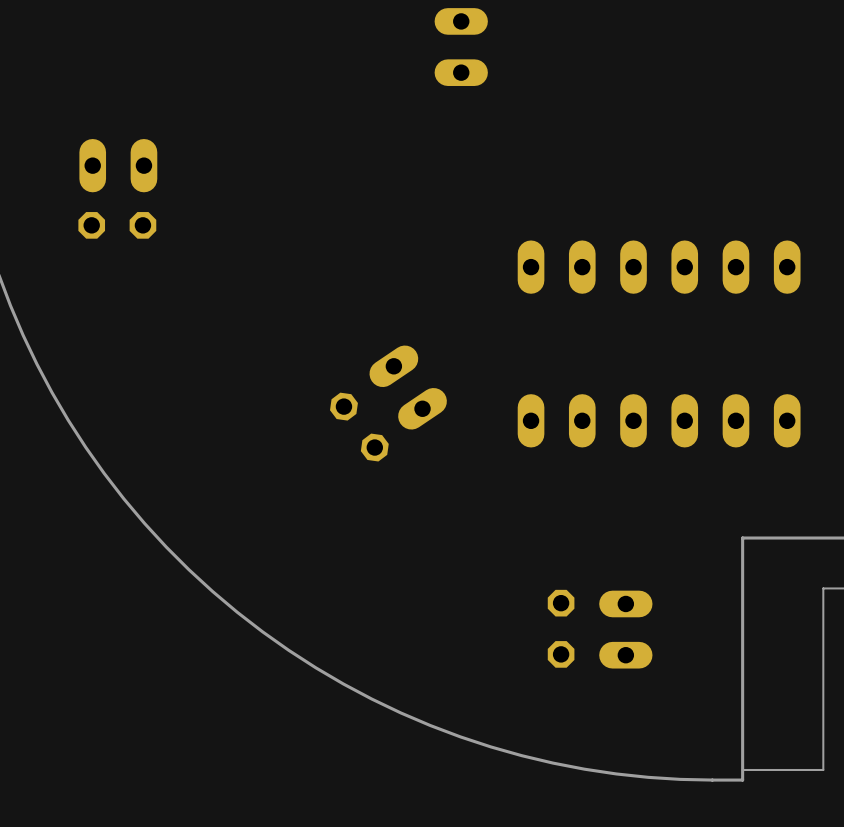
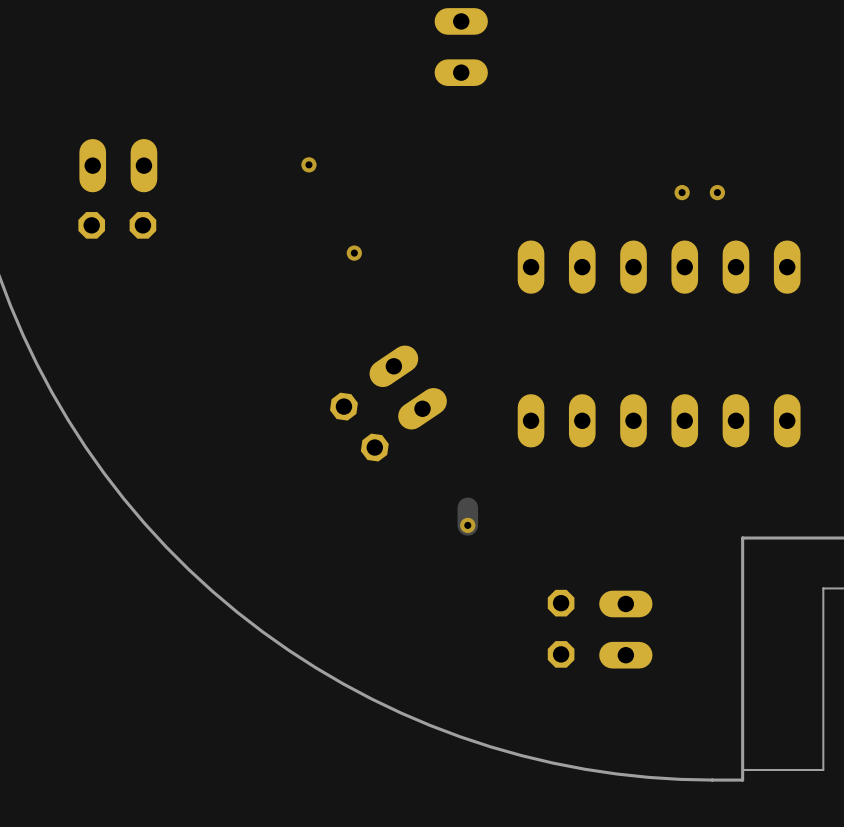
via: none -> (308, 164)
via: none -> (682, 192)
via: none -> (717, 192)
via: none -> (354, 253)
track: none -> (467, 507) (467, 525)
via: none -> (467, 525)

